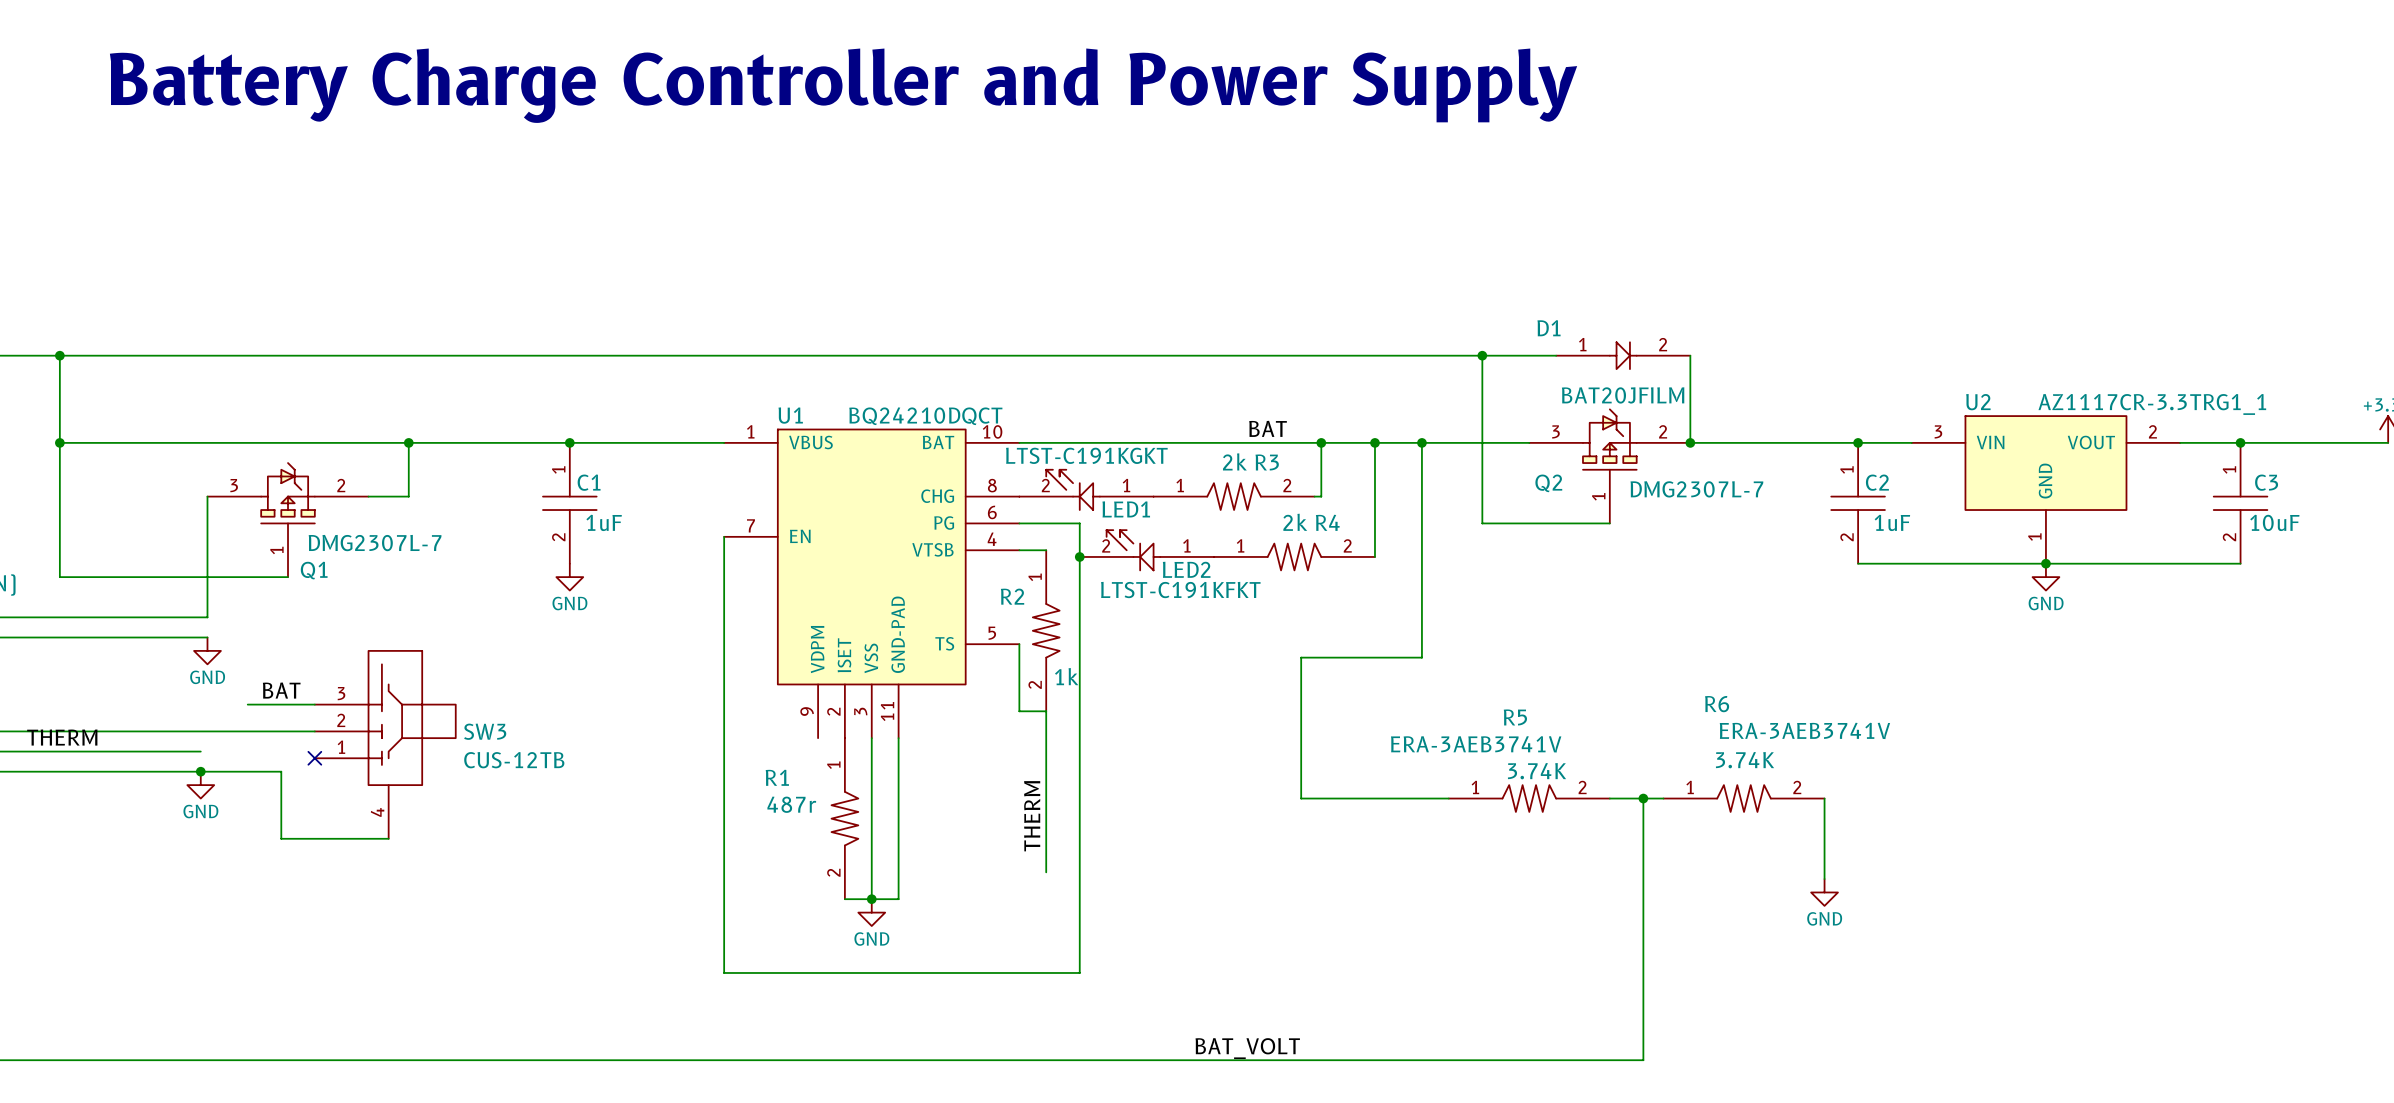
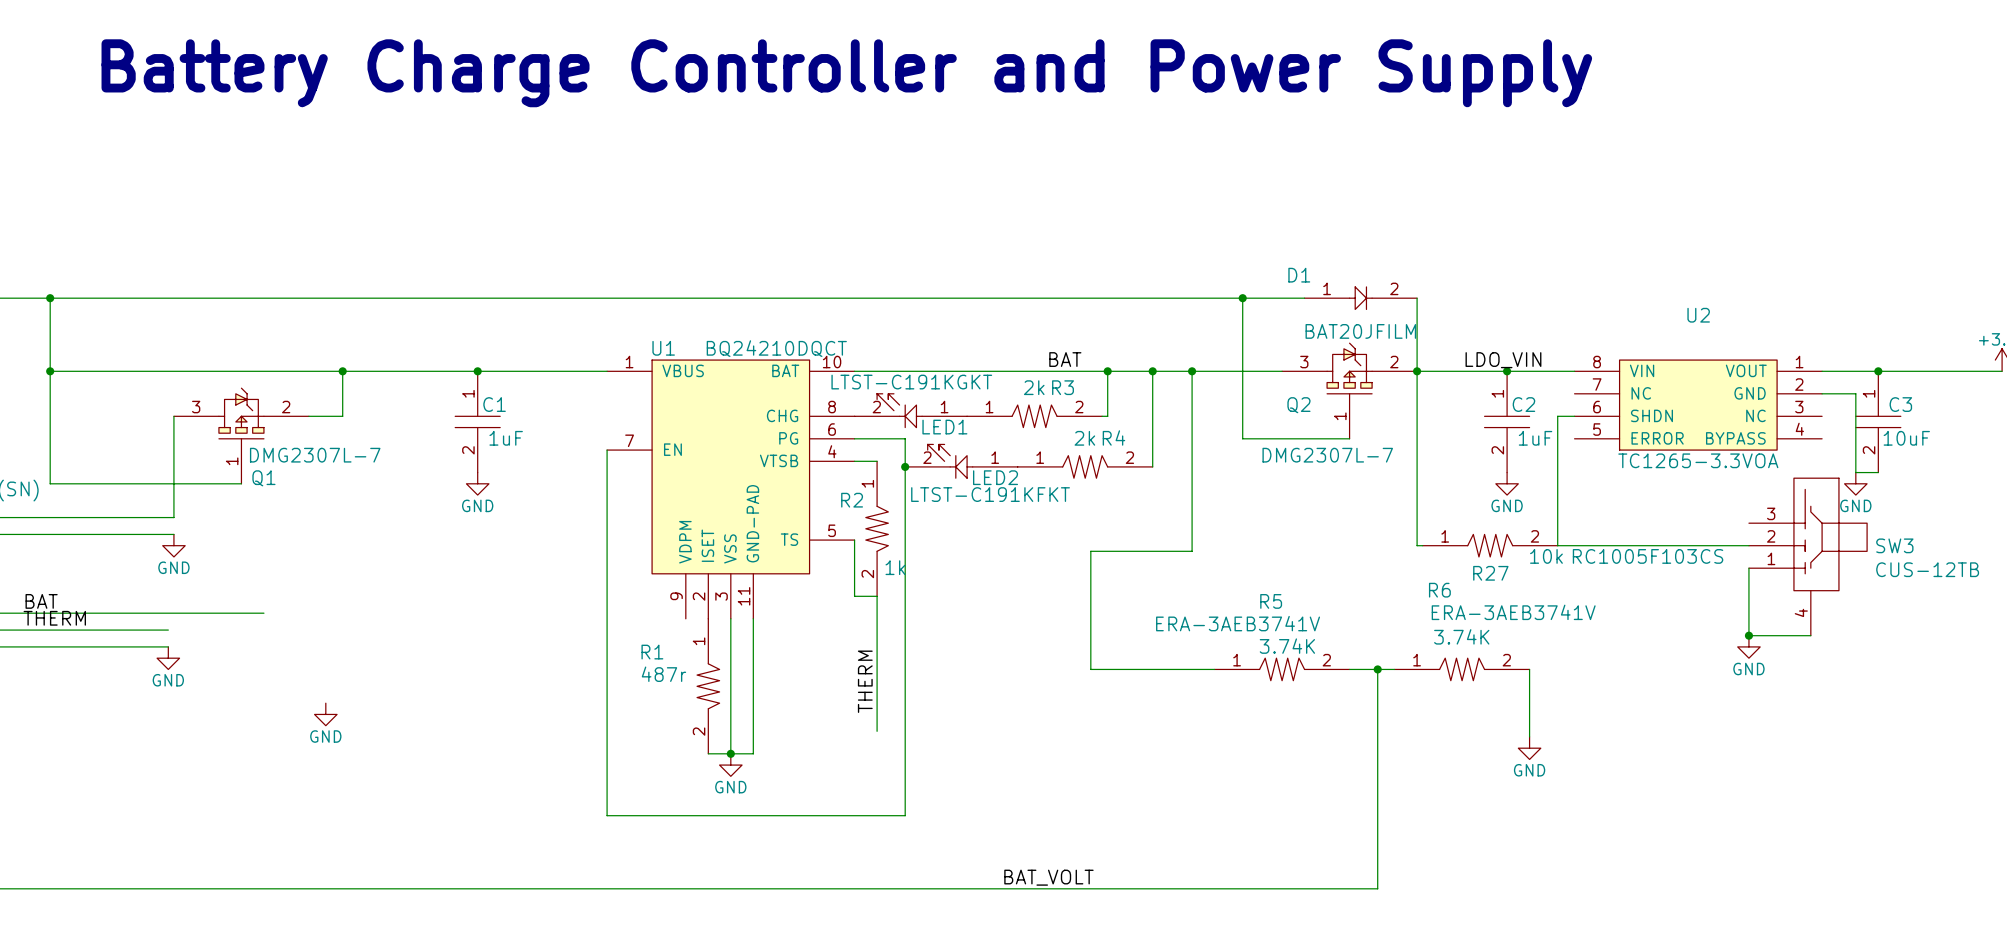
U2 name position: U2 (1978, 402) -> U2 (1698, 315)
U2 value: AZ1117CR-3.3TRG1_1 (2152, 404) -> TC1265-3.3VOA (1698, 460)
U2 symbol: [1911, 416, 2181, 564] -> [1574, 360, 1823, 451]
label: none -> LDO_VIN (1503, 360)
wire: none -> (1417, 371) (1417, 545) (1422, 545)
junction position: (1858, 442) -> (1507, 371)
Q2 value position: DMG2307L-7 (1696, 489) -> DMG2307L-7 (1327, 455)
wire: none -> (1574, 416) (1557, 416) (1557, 545) (1748, 545)
C2 position: (1858, 503) -> (1507, 421)
wire: (1858, 563) (2213, 563) -> (1822, 393) (1855, 393) (1855, 472)
junction: (2045, 563) -> none
power symbol: none -> GND (1507, 483)
power symbol: GND (2045, 577) -> none
power symbol: none -> GND (1855, 483)
R27: none -> RC1005F103CS (1490, 545)
wire: none -> (1748, 568) (1748, 635) (1810, 635)
label position: BAT (281, 690) -> BAT (41, 601)
wire: (247, 704) (314, 704) -> none
SW3 position: (385, 744) -> (1808, 556)
no-connect mark: (314, 758) -> none
junction: none -> (1748, 635)
wire: (200, 771) (281, 771) (281, 838) (388, 838) -> none
junction: (200, 771) -> none
power symbol: none -> GND (1748, 646)
power symbol: none -> GND (325, 714)

